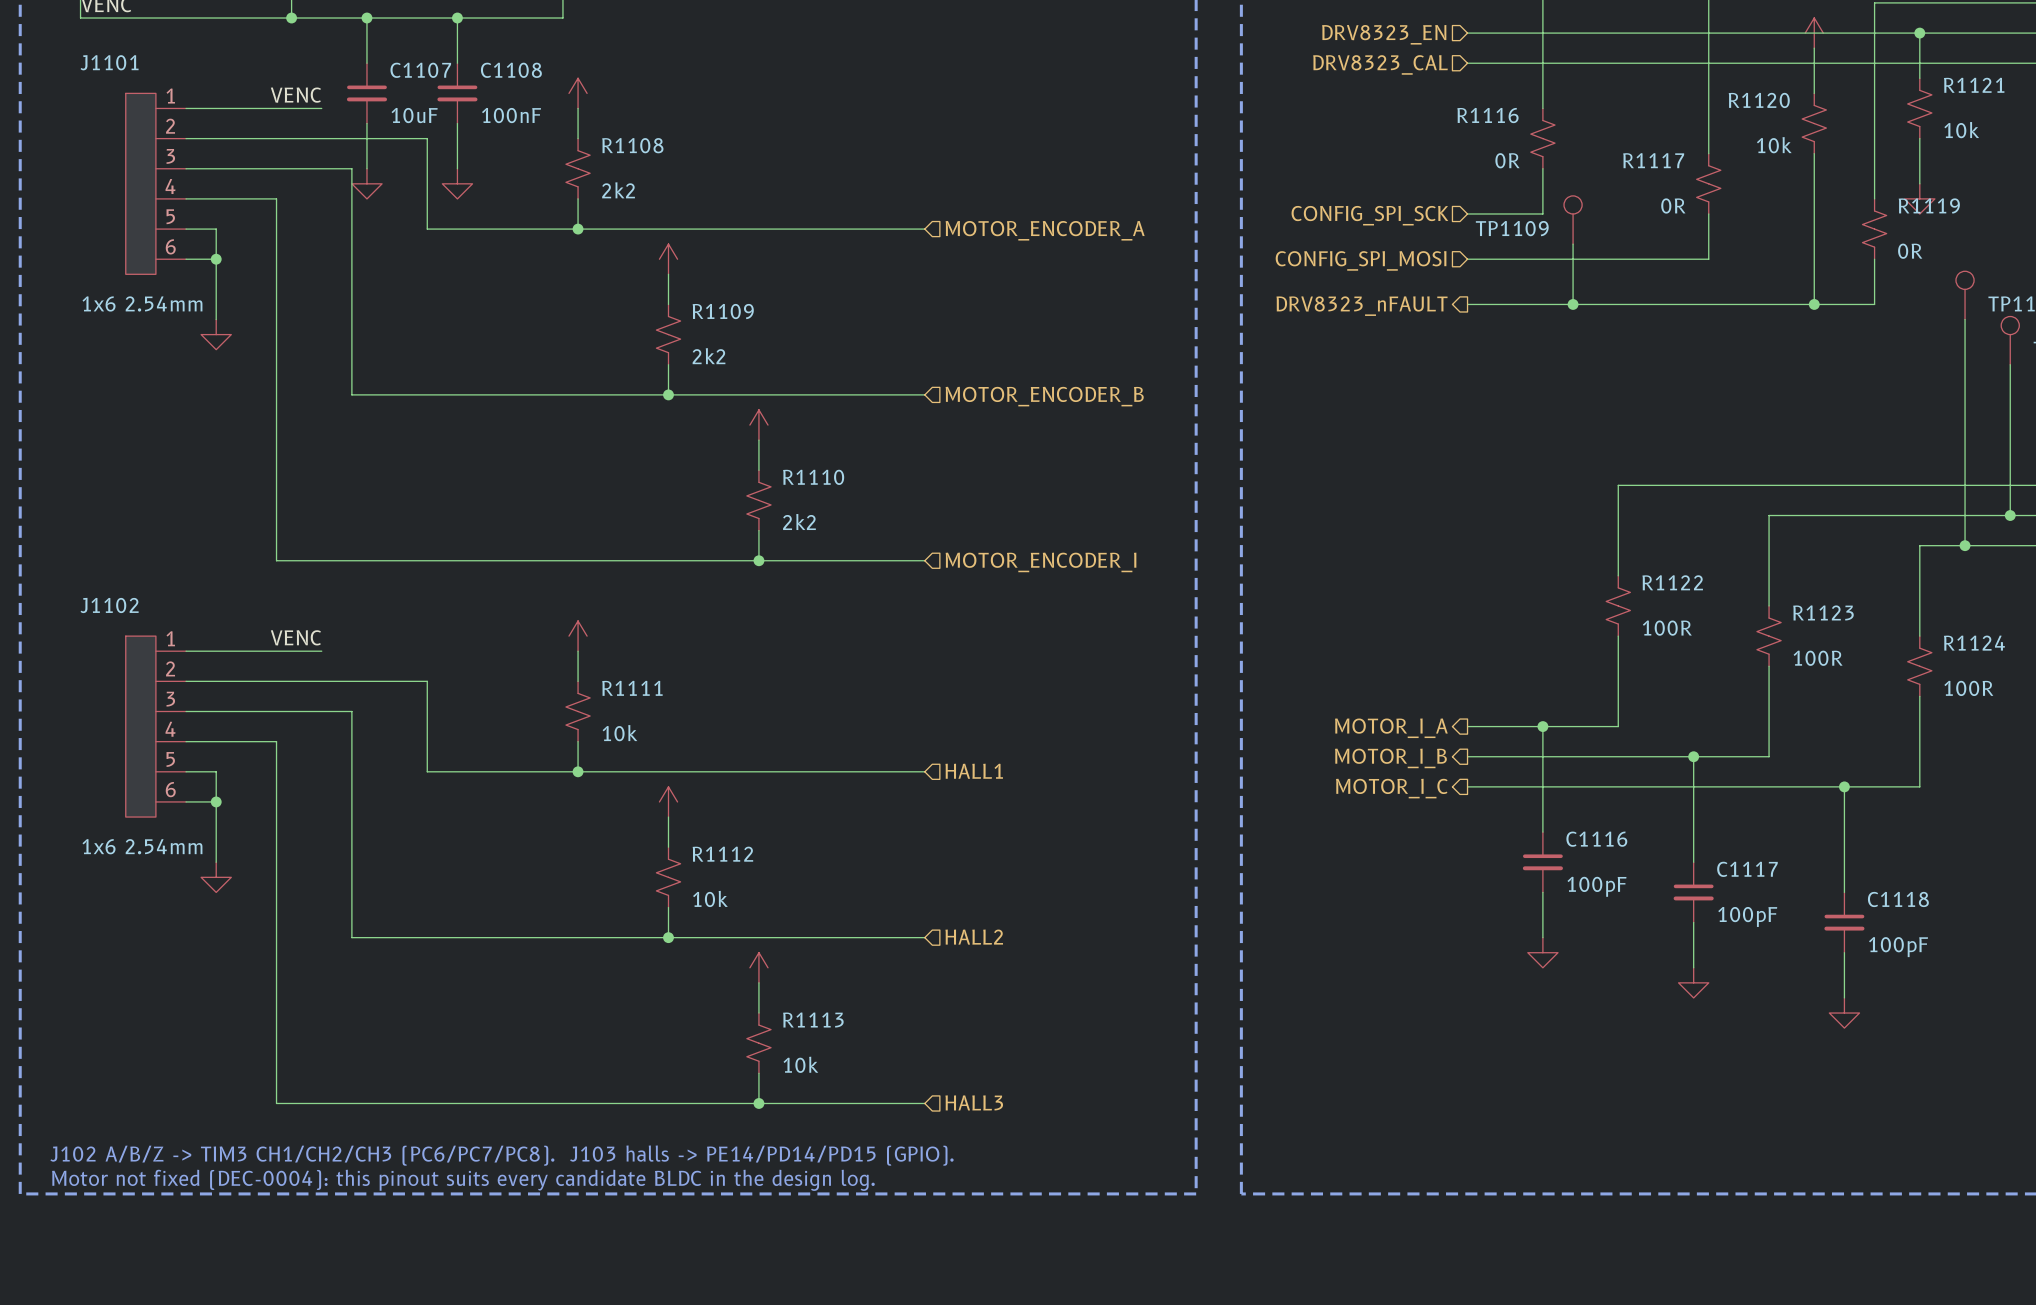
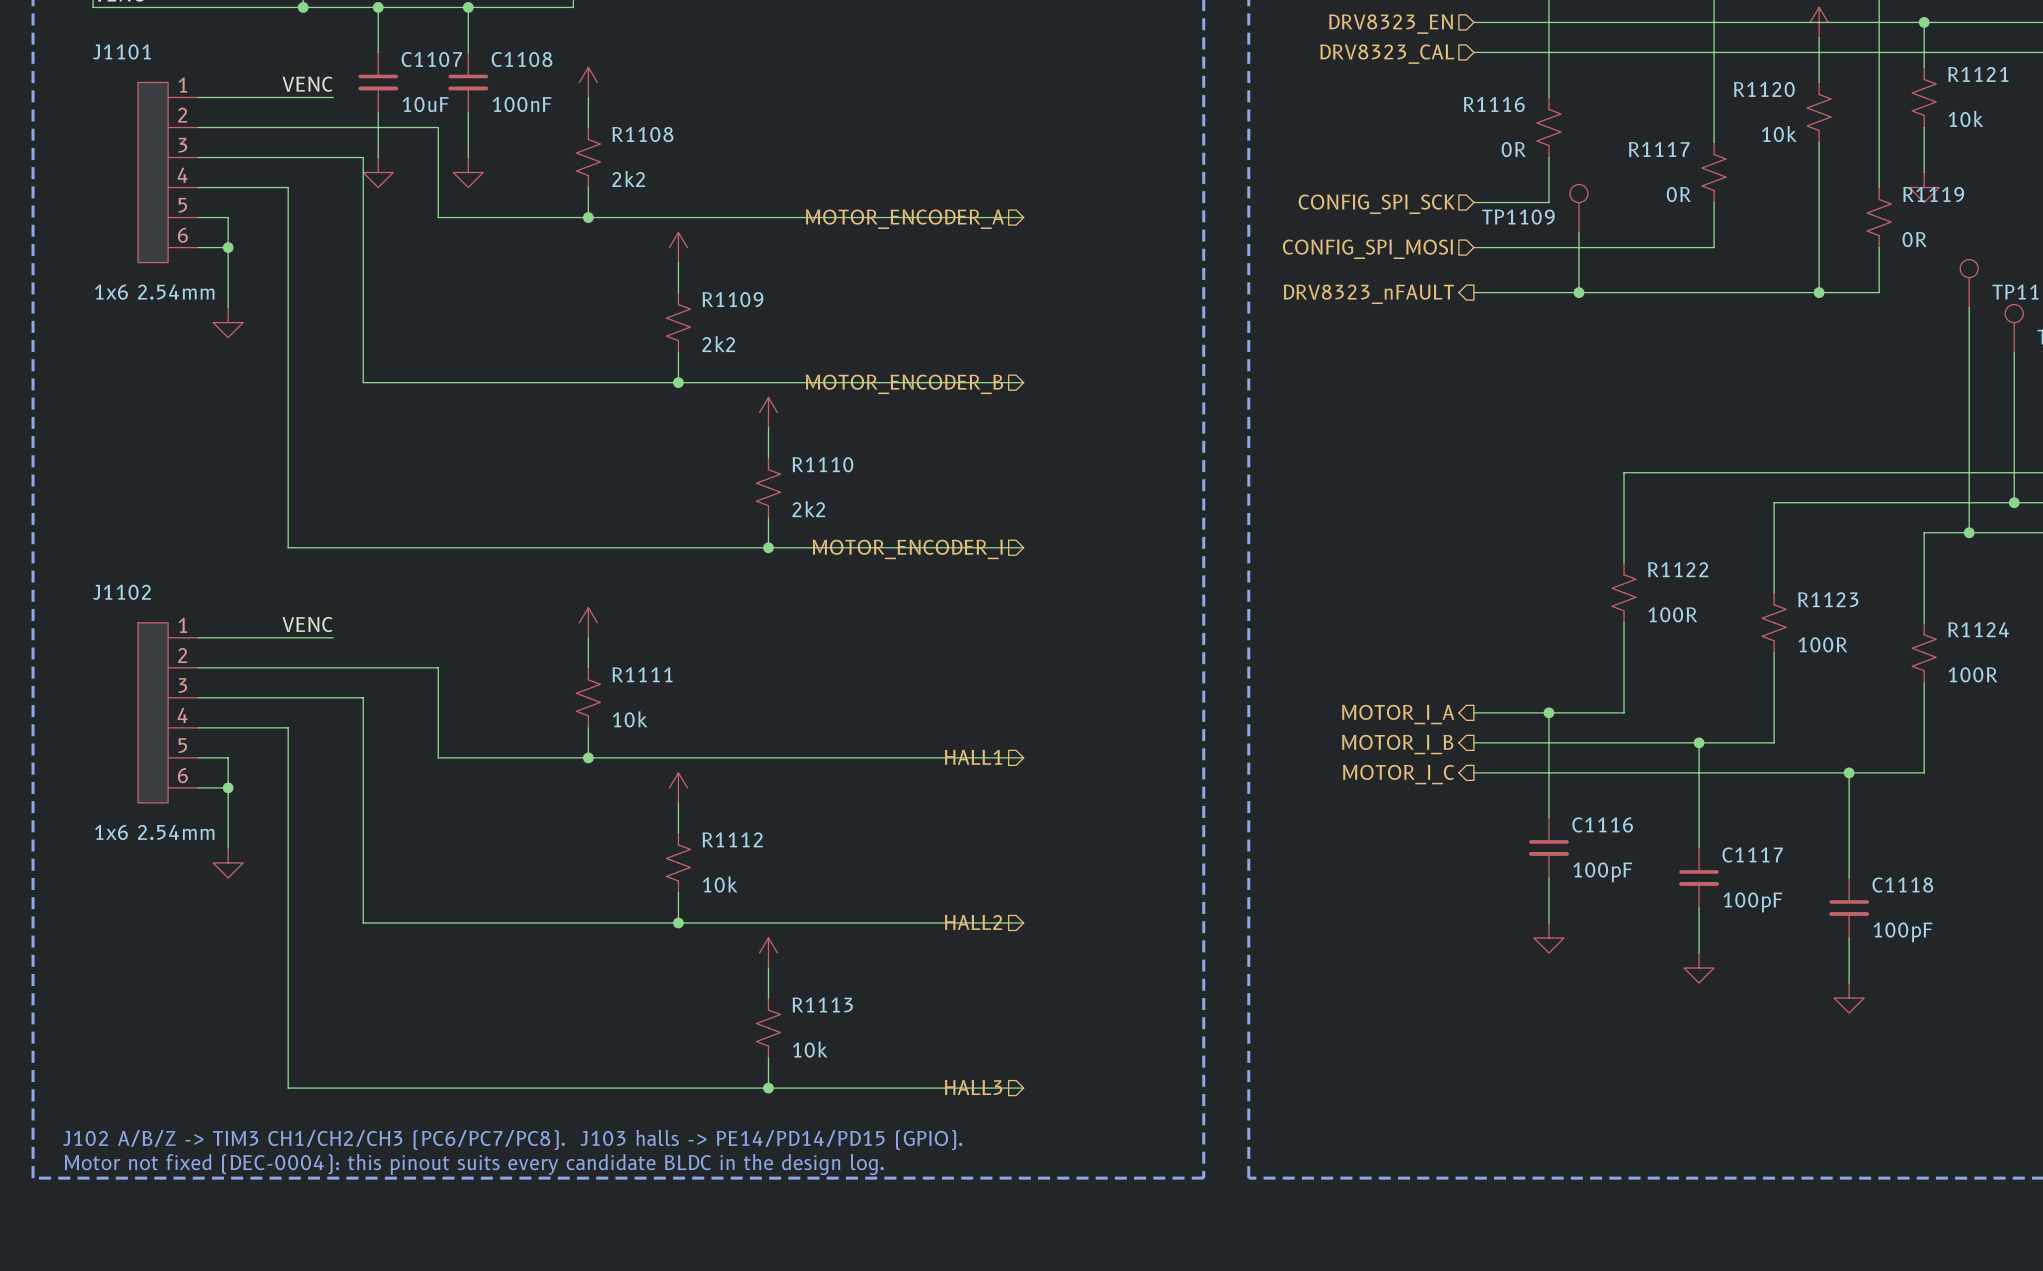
wire: none -> (933, 217) (1023, 217)
hierarchical label rotation: 0° (1045, 230) -> 180° (904, 219)
wire: none -> (933, 382) (1023, 382)
hierarchical label rotation: 0° (1044, 396) -> 180° (904, 384)
wire: none -> (933, 547) (1023, 547)
hierarchical label rotation: 0° (1041, 562) -> 180° (907, 549)
wire: none -> (933, 757) (1023, 757)
hierarchical label rotation: 0° (974, 771) -> 180° (973, 757)
wire: none -> (933, 922) (1023, 922)
hierarchical label rotation: 0° (974, 937) -> 180° (973, 922)
hierarchical label rotation: 0° (974, 1102) -> 180° (973, 1087)
wire: none -> (933, 1088) (1023, 1088)

